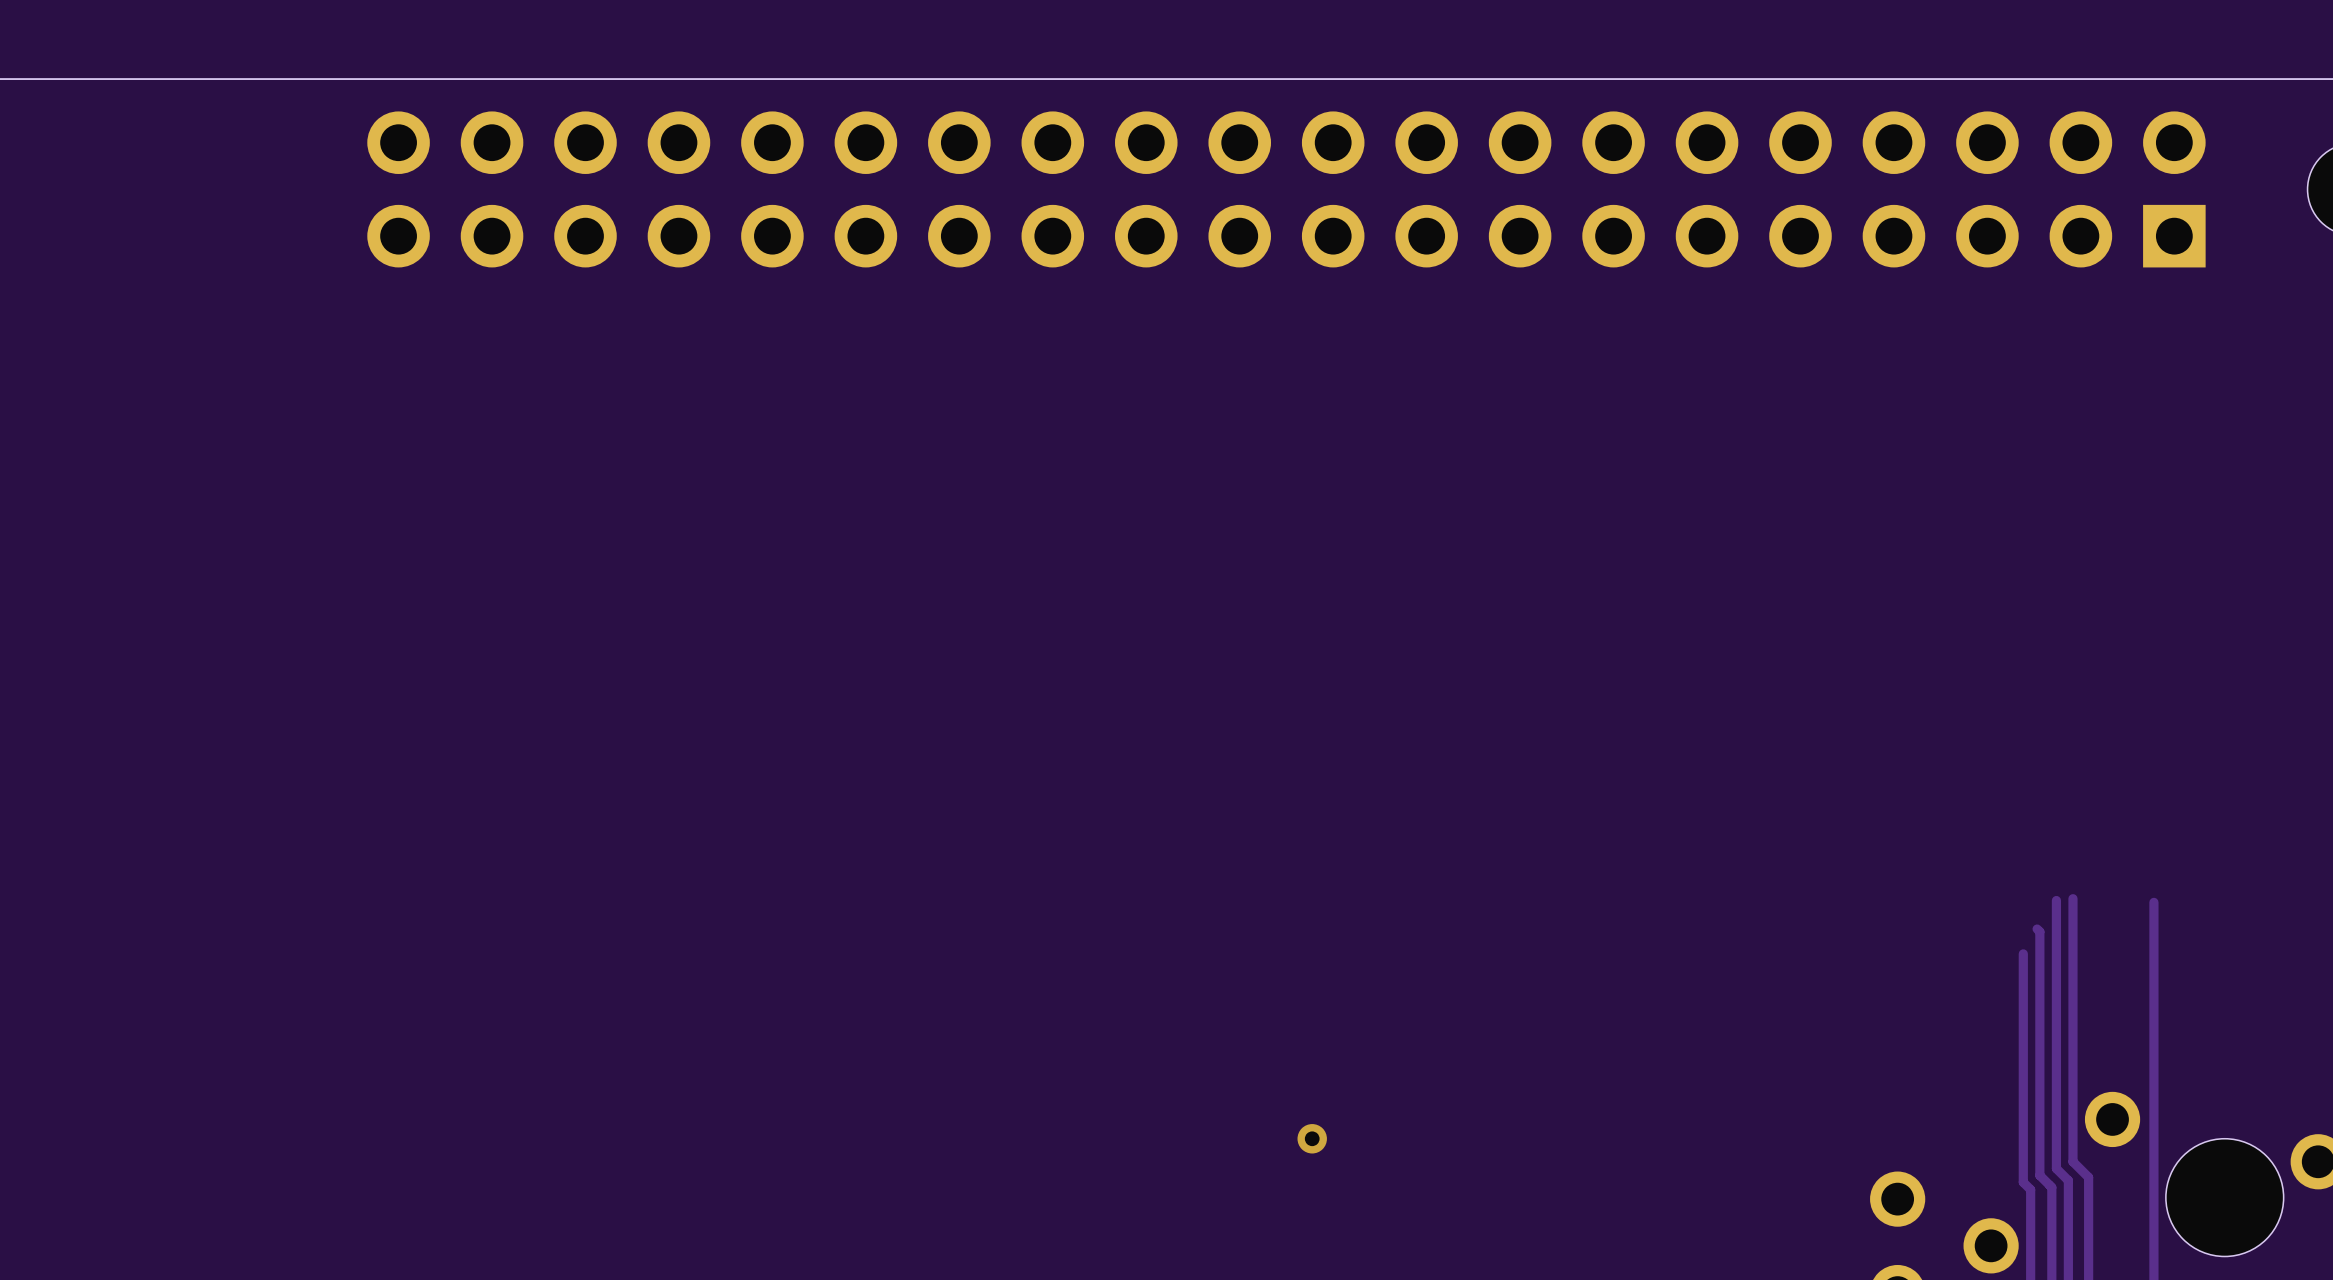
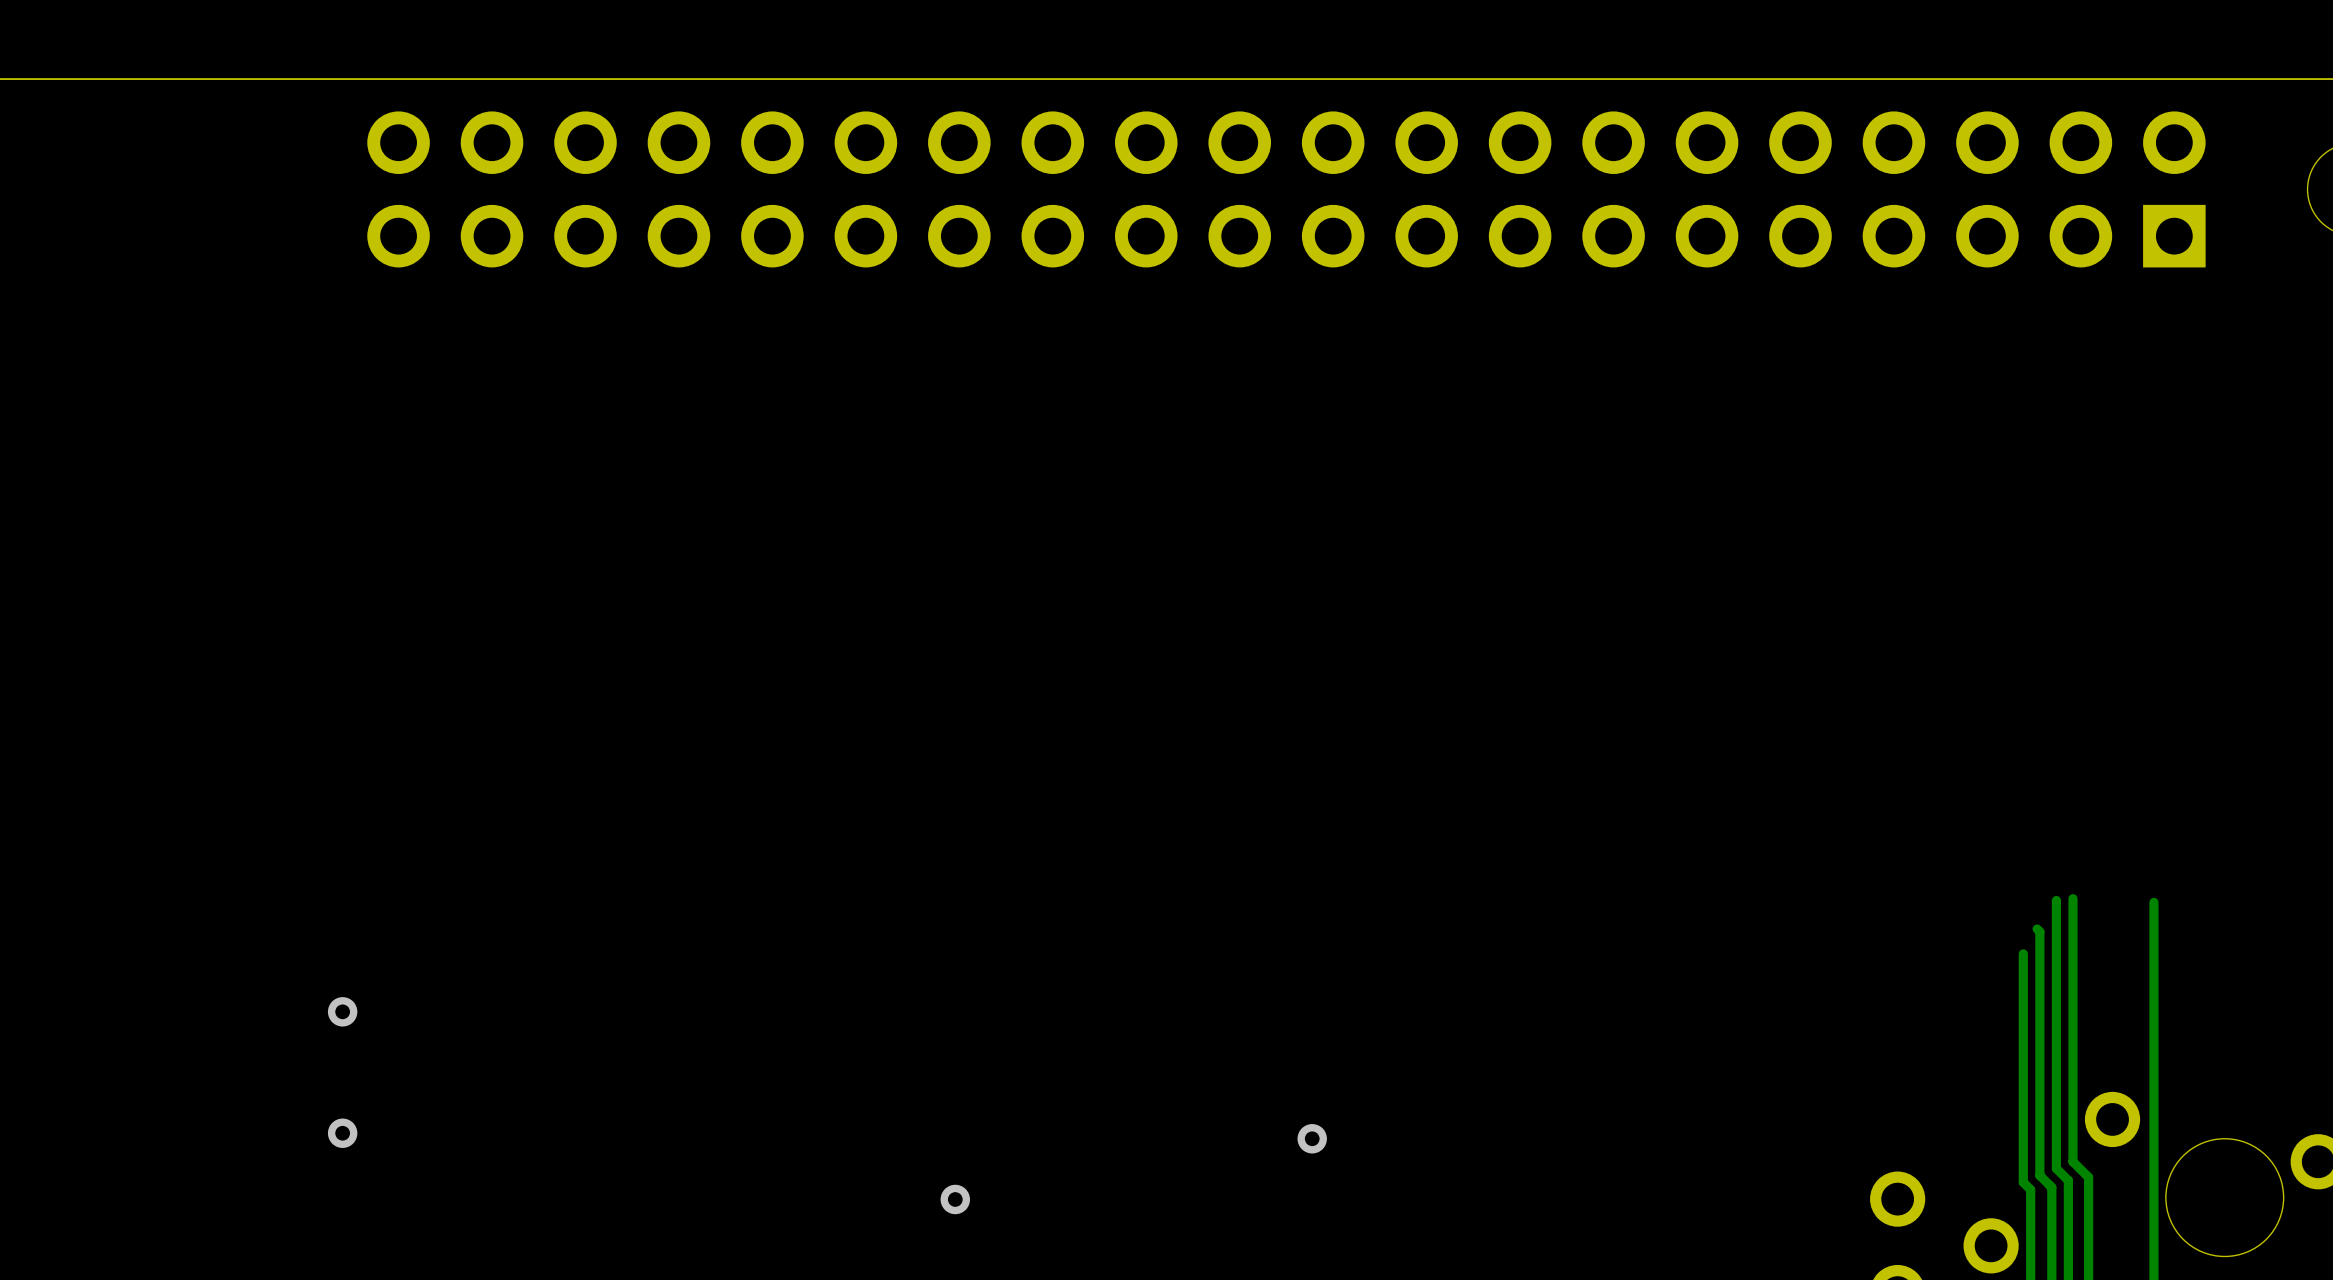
via: none -> (342, 1011)
via: none -> (342, 1133)
via: none -> (955, 1199)

